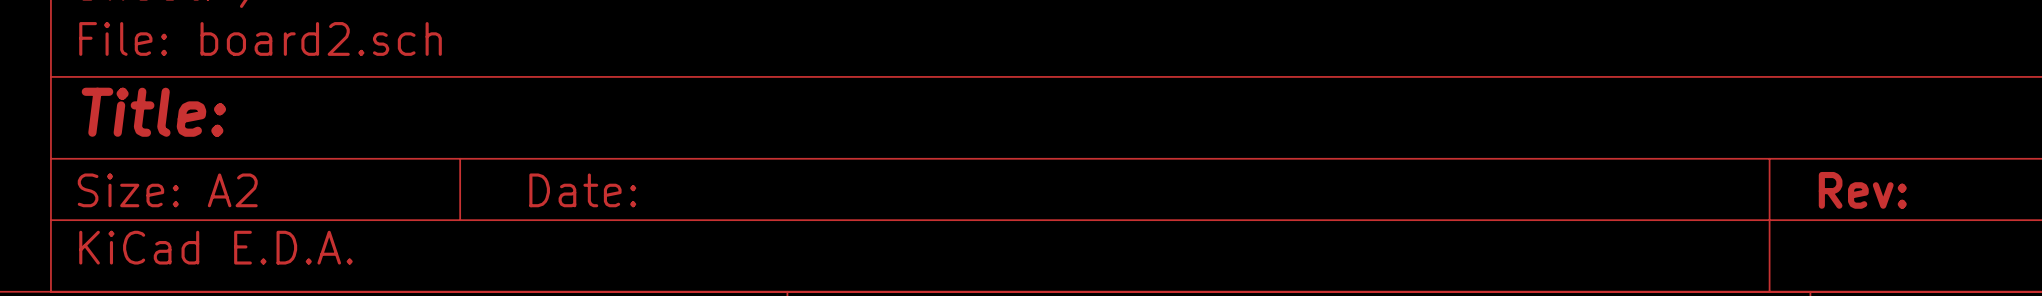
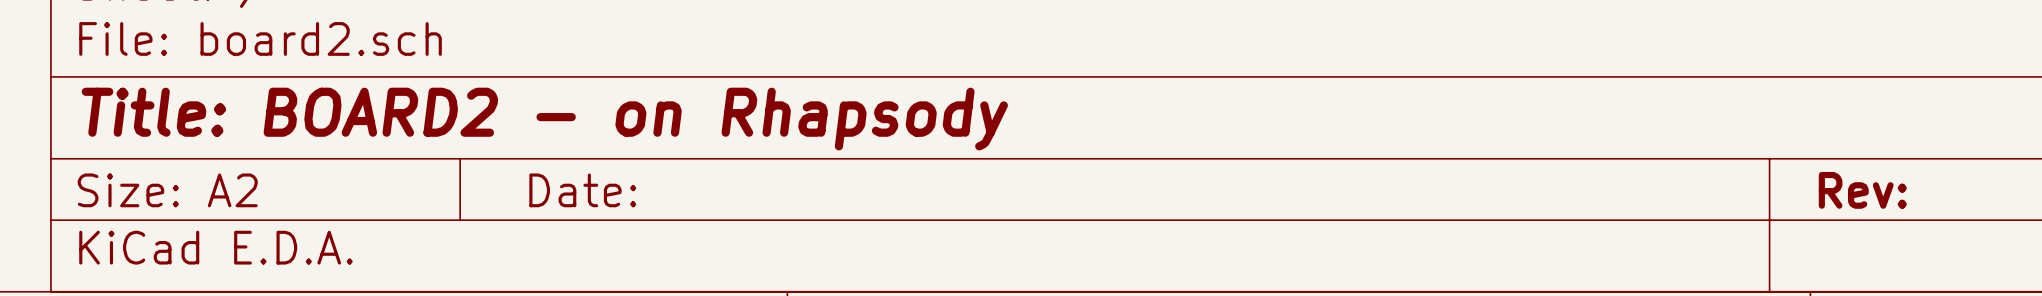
title block: Title: (153, 112) -> Title: BOARD2 - on Rhapsody (544, 119)

